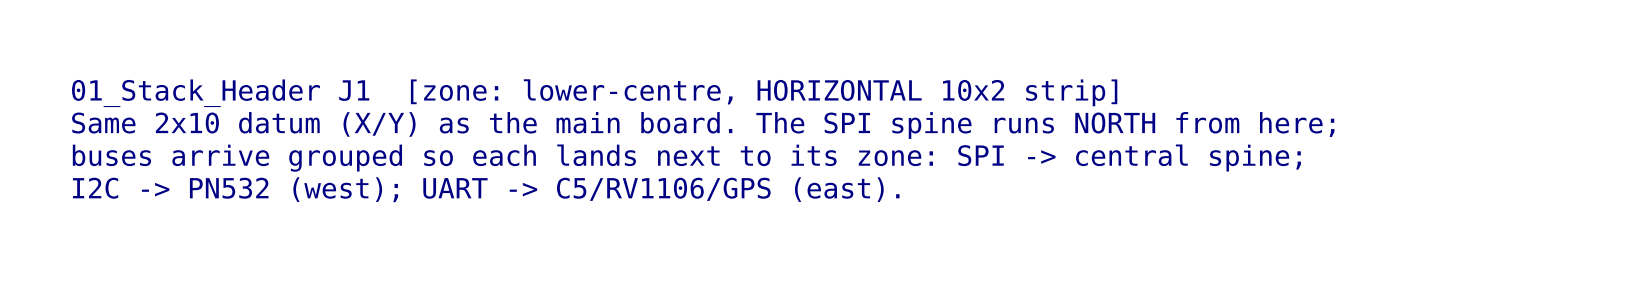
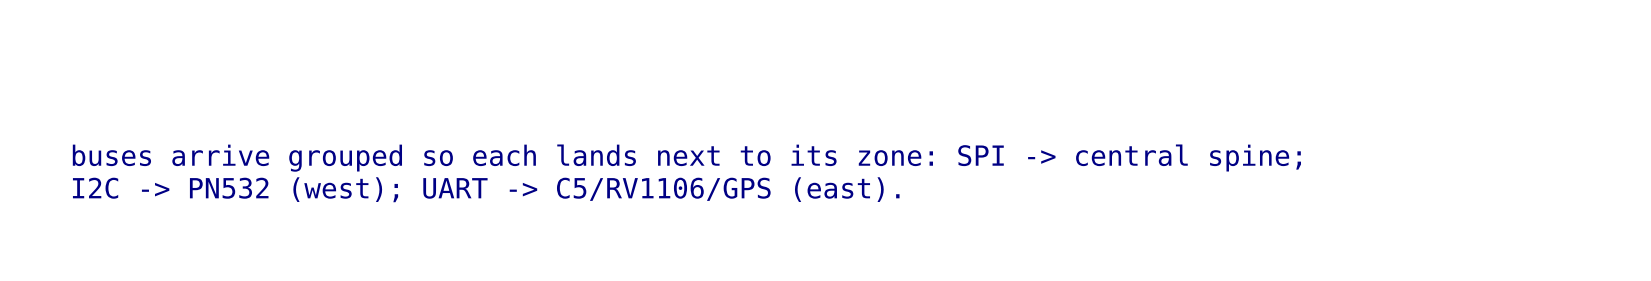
text: 01_Stack_Header J1 [zone: lower-centre, HORIZONTAL 10x2 strip] (594, 93) -> none
text: Same 2x10 datum (X/Y) as the main board. The SPI spine runs NORTH from here; (703, 125) -> none

